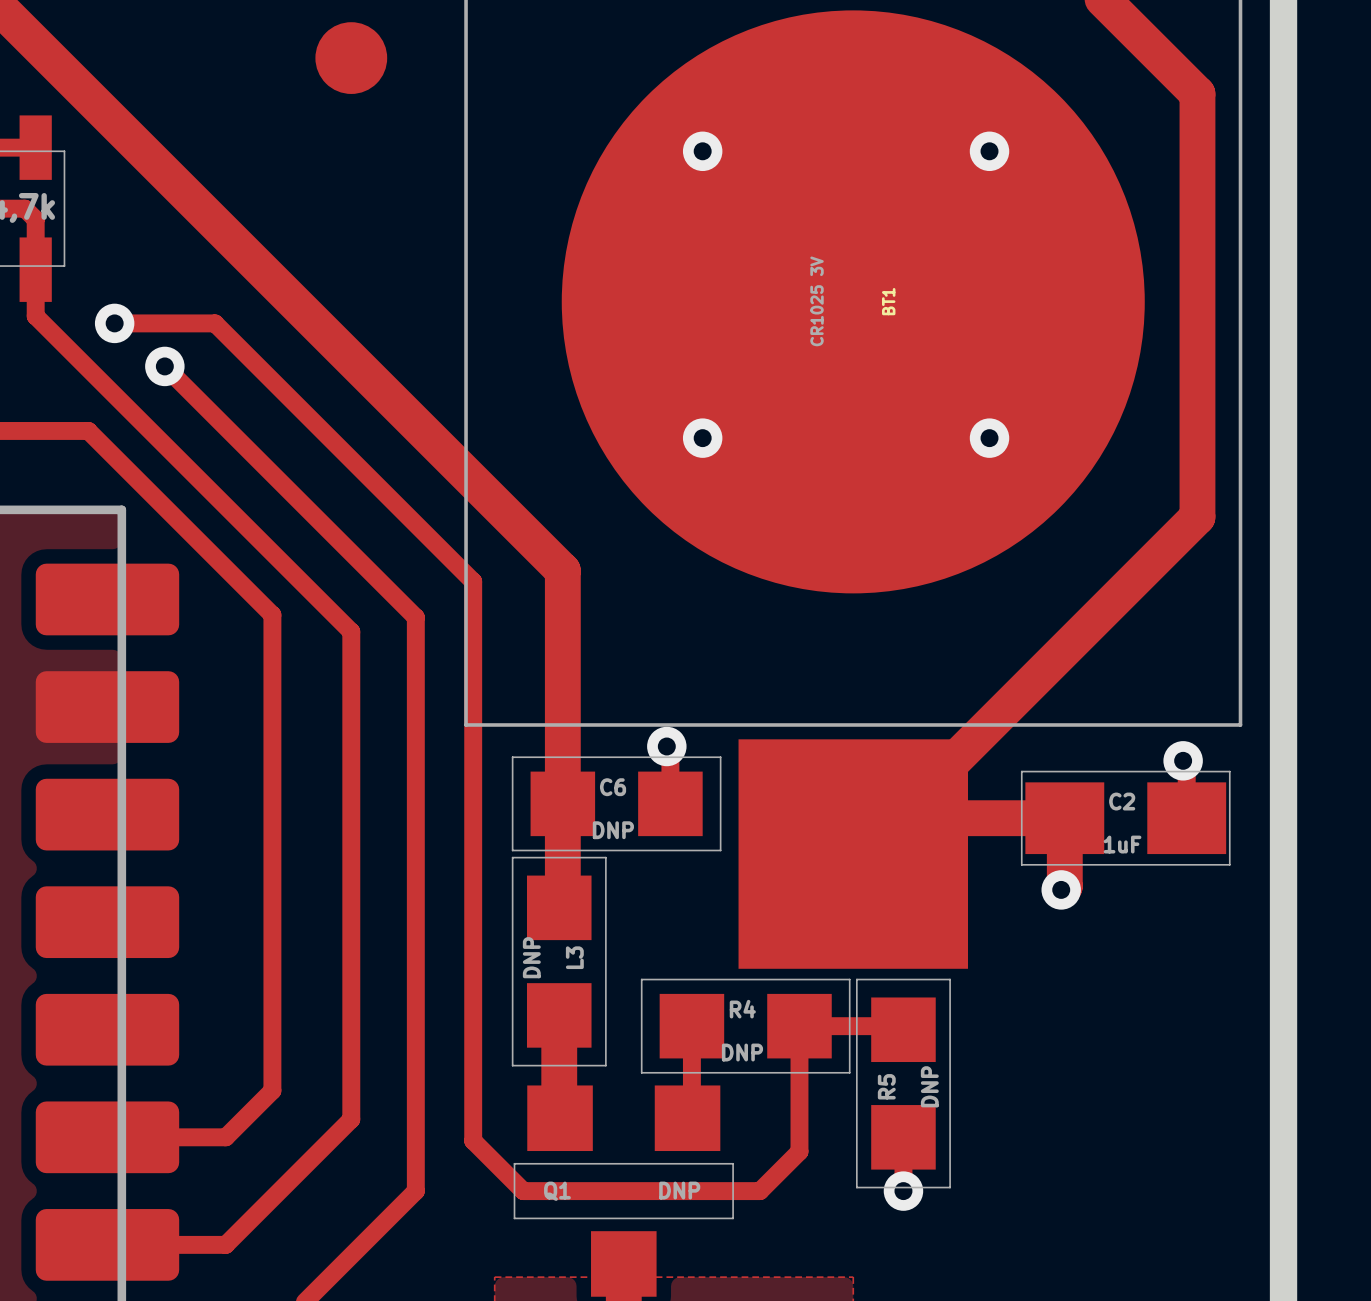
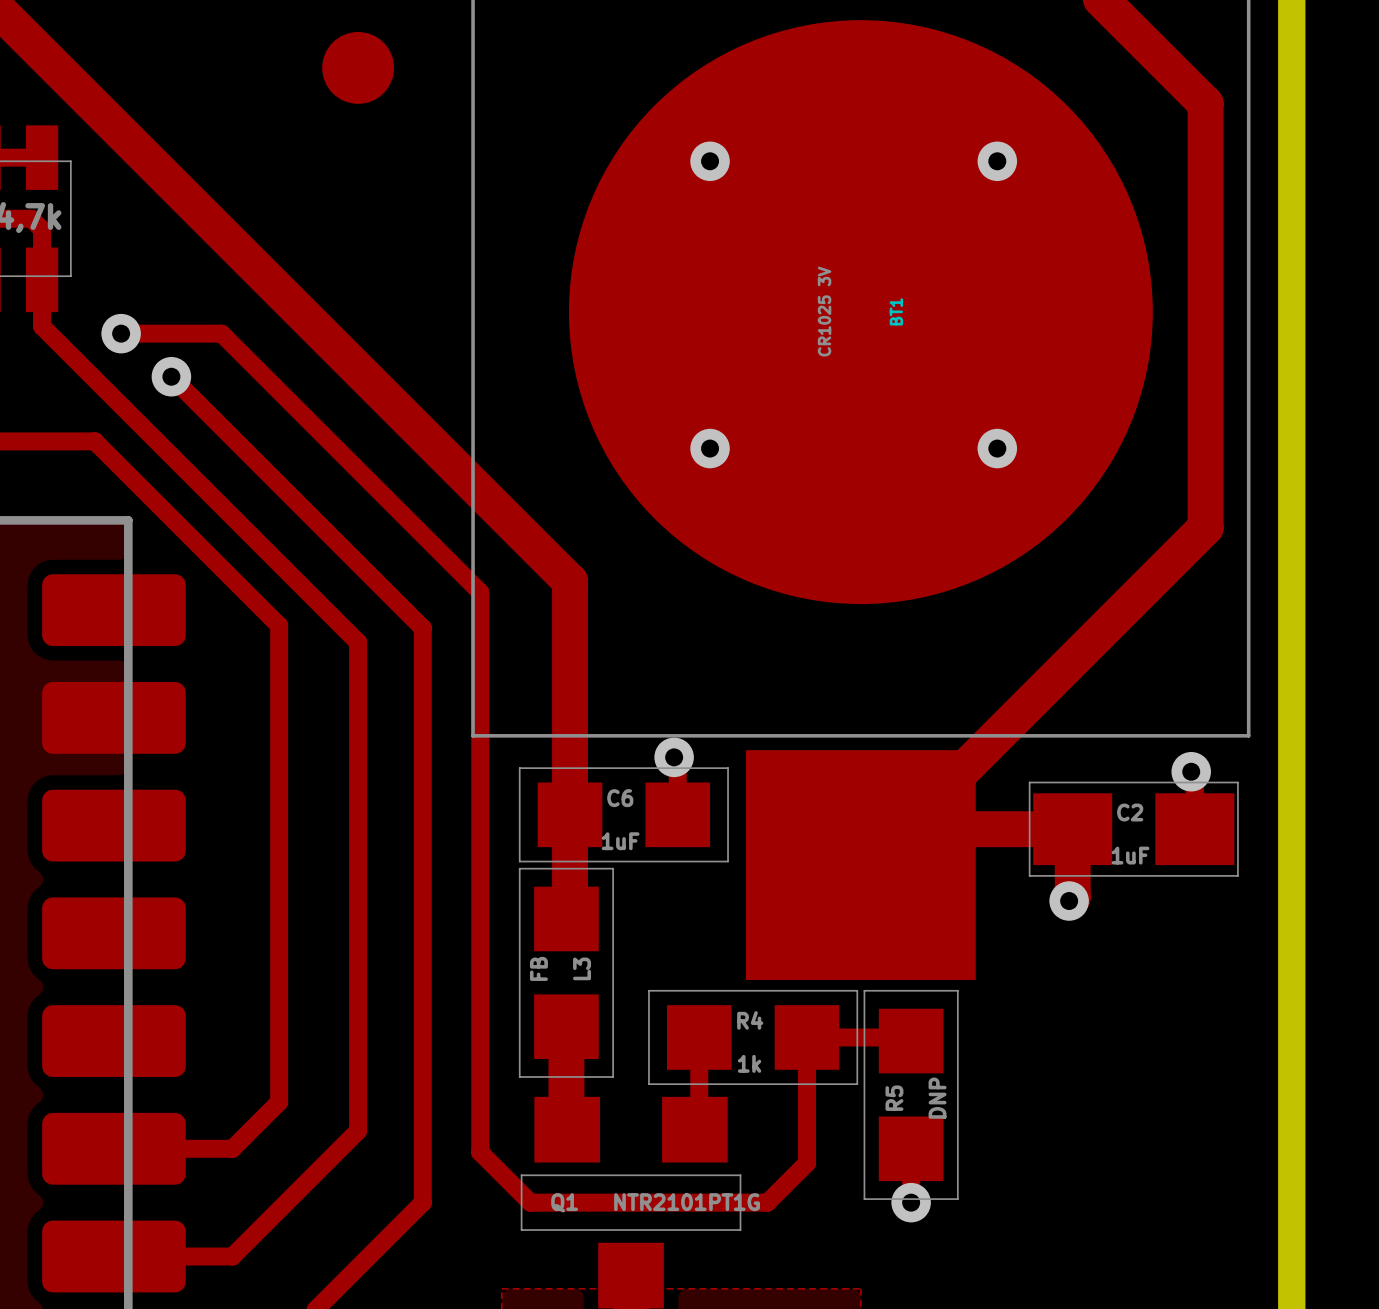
C6 value: DNP (613, 830) -> 1uF (620, 841)
L3 value: DNP (531, 957) -> FB (538, 968)
R4 value: DNP (742, 1052) -> 1k (749, 1063)
Q1 value: DNP (679, 1190) -> NTR2101PT1G (687, 1202)

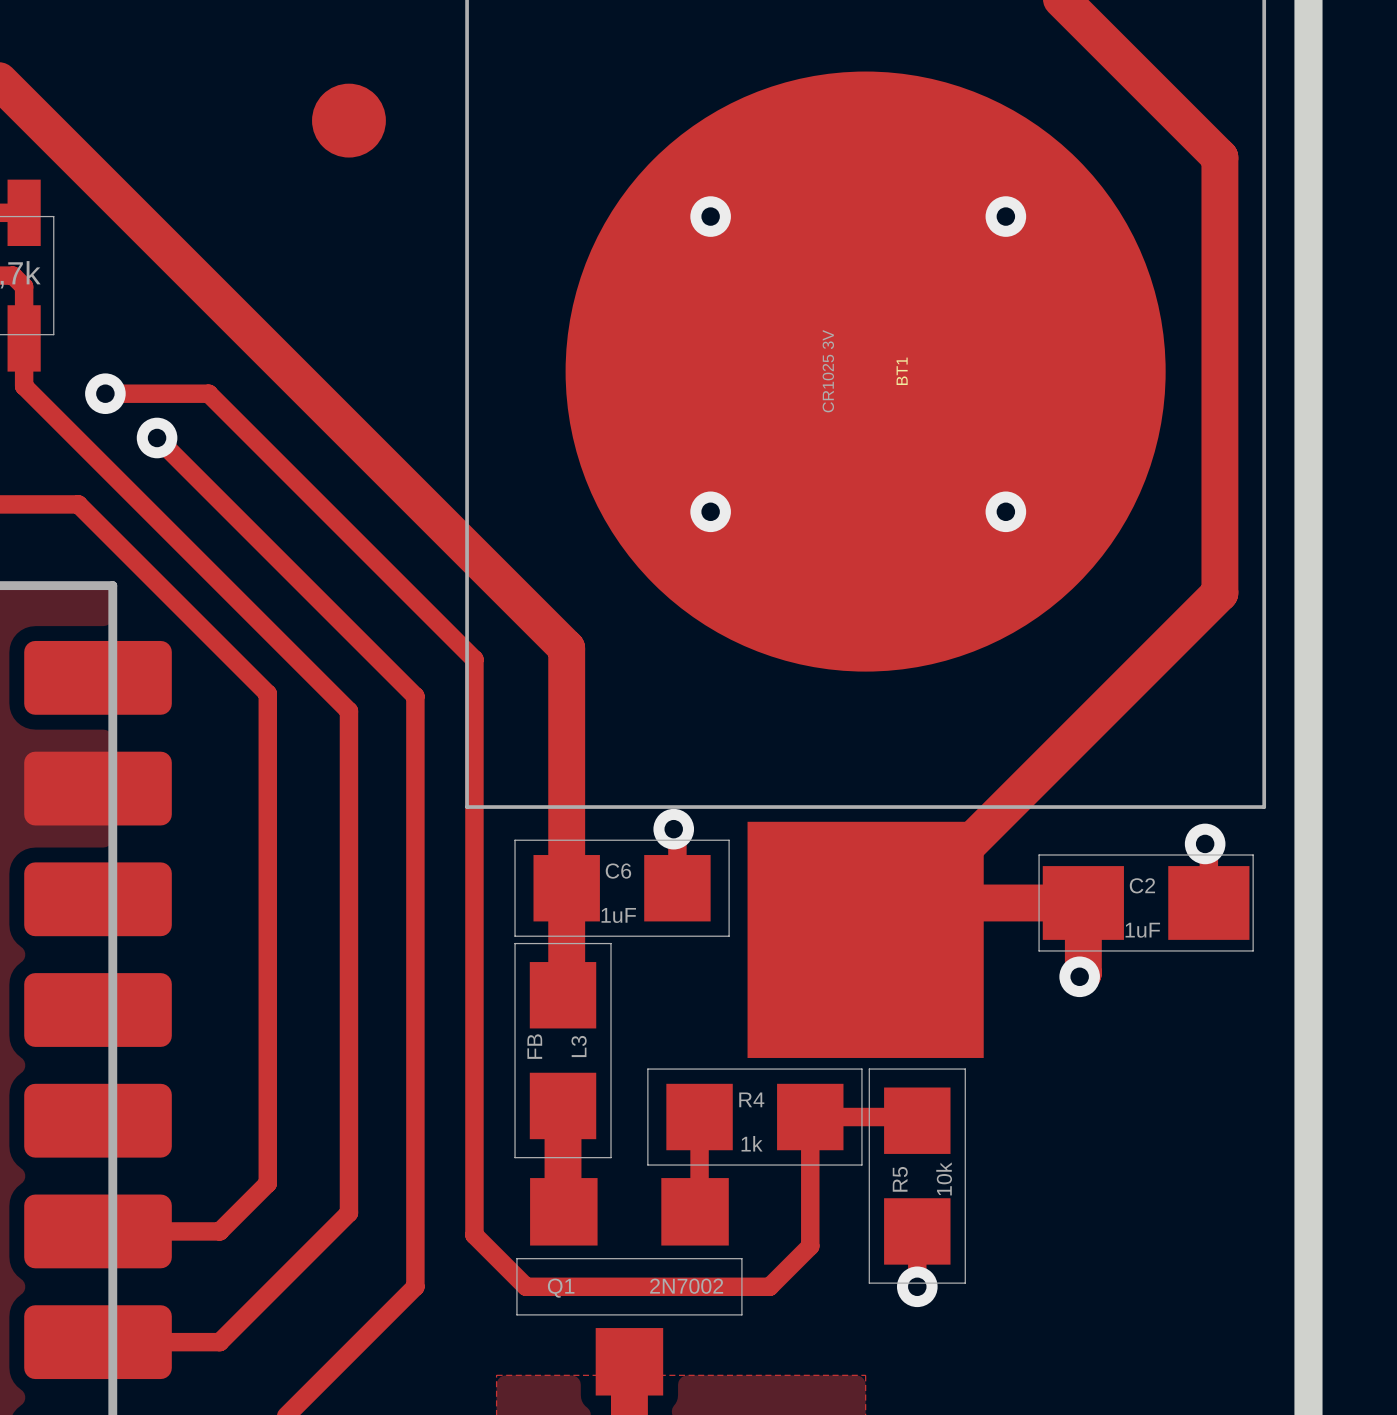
R5 value: DNP (937, 1098) -> 10k (944, 1178)
Q1 value: NTR2101PT1G (687, 1202) -> 2N7002 (686, 1286)

